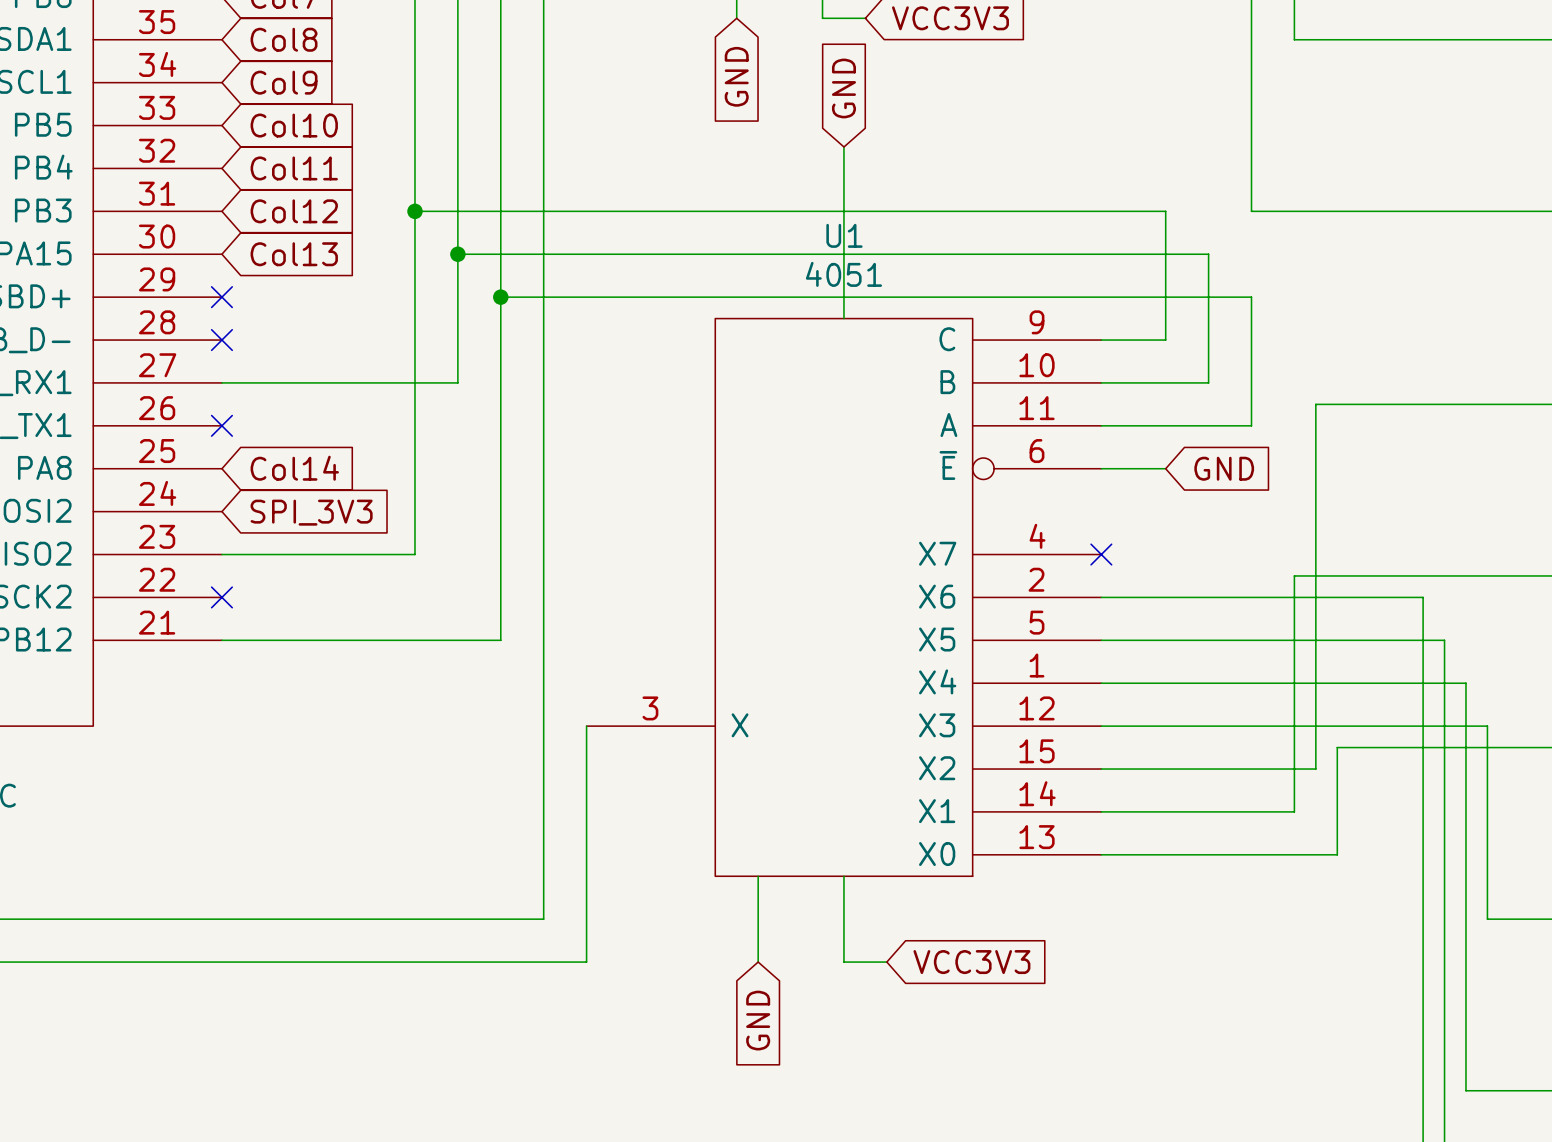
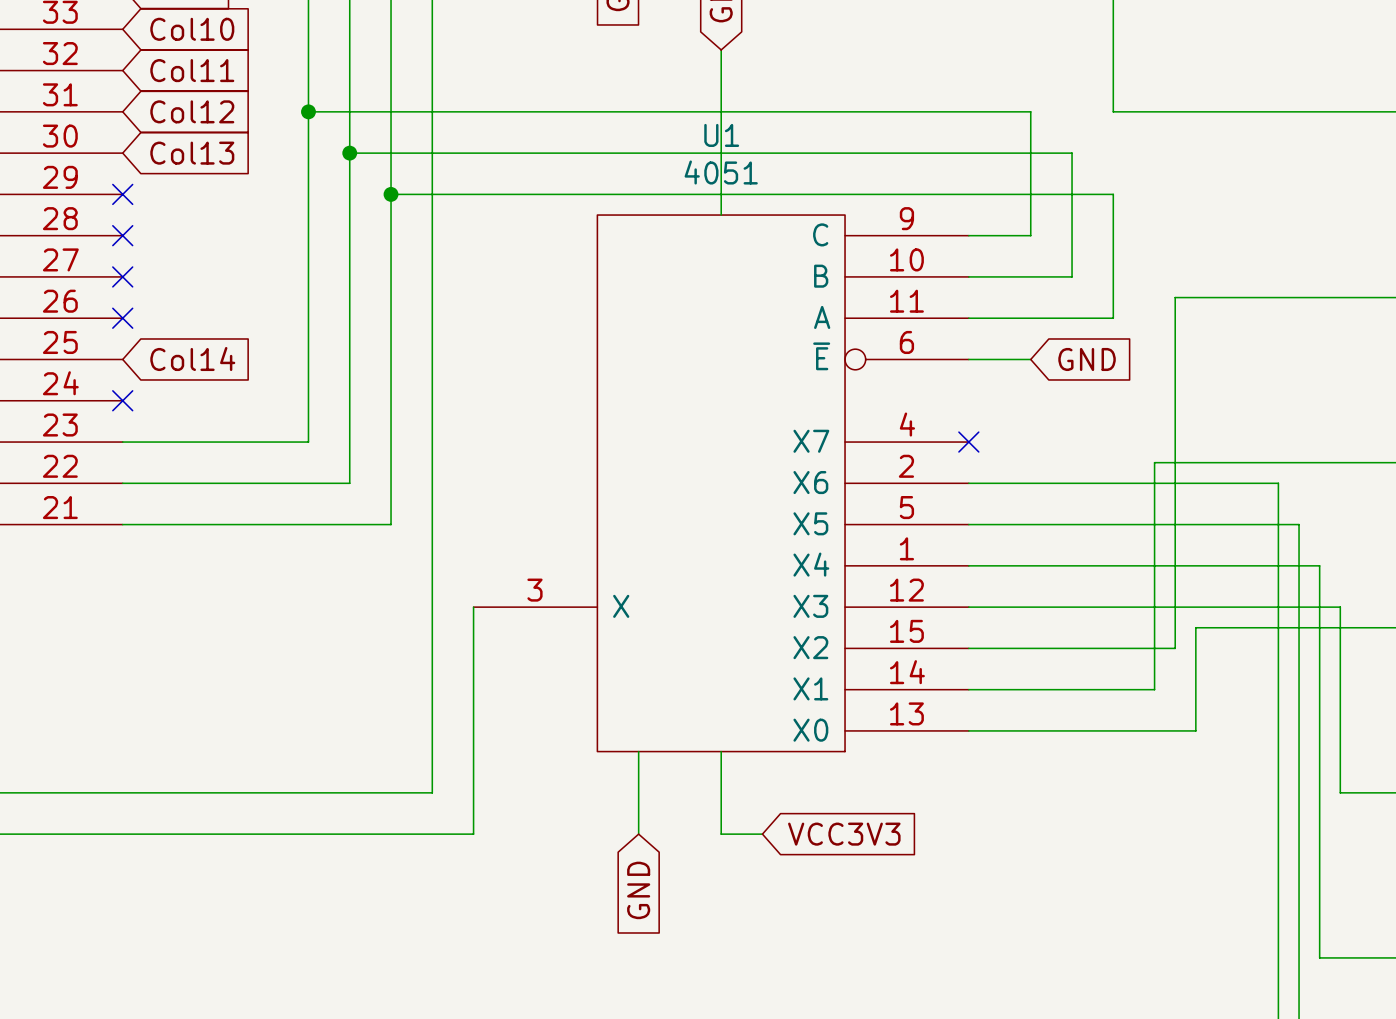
wire: (221, 382) (457, 382) -> (122, 483) (349, 483) (349, 276)
no-connect mark: none -> (122, 276)
global label: SPI_3V3 (311, 512) -> none
no-connect mark position: (221, 597) -> (122, 400)

